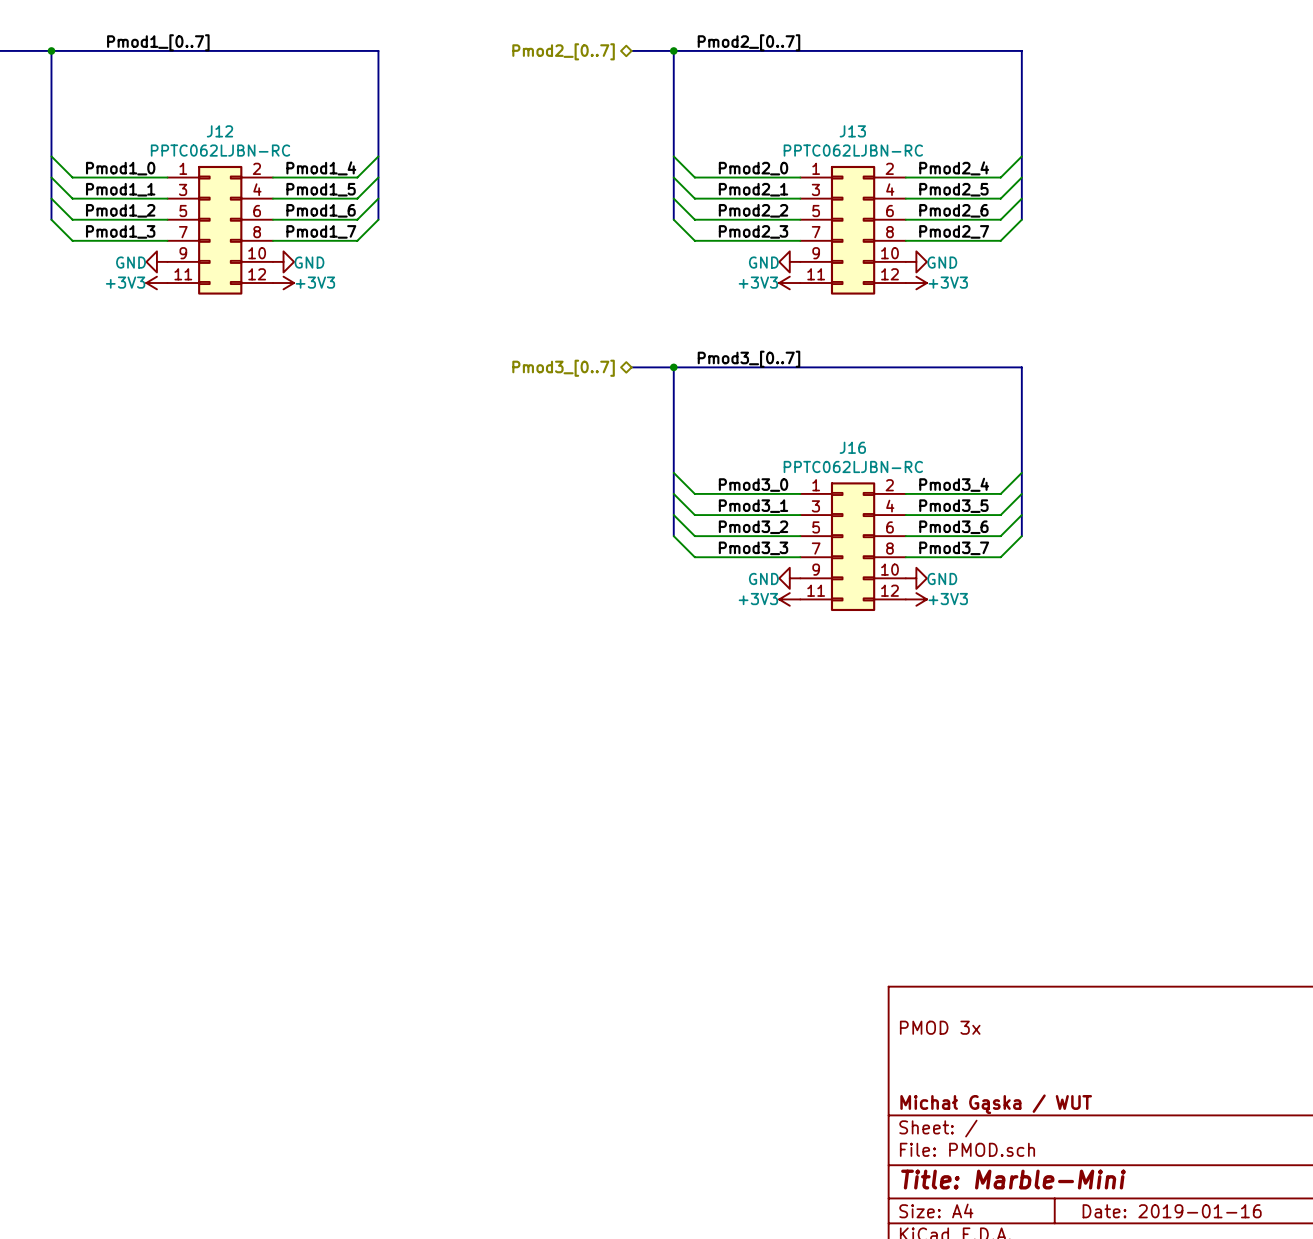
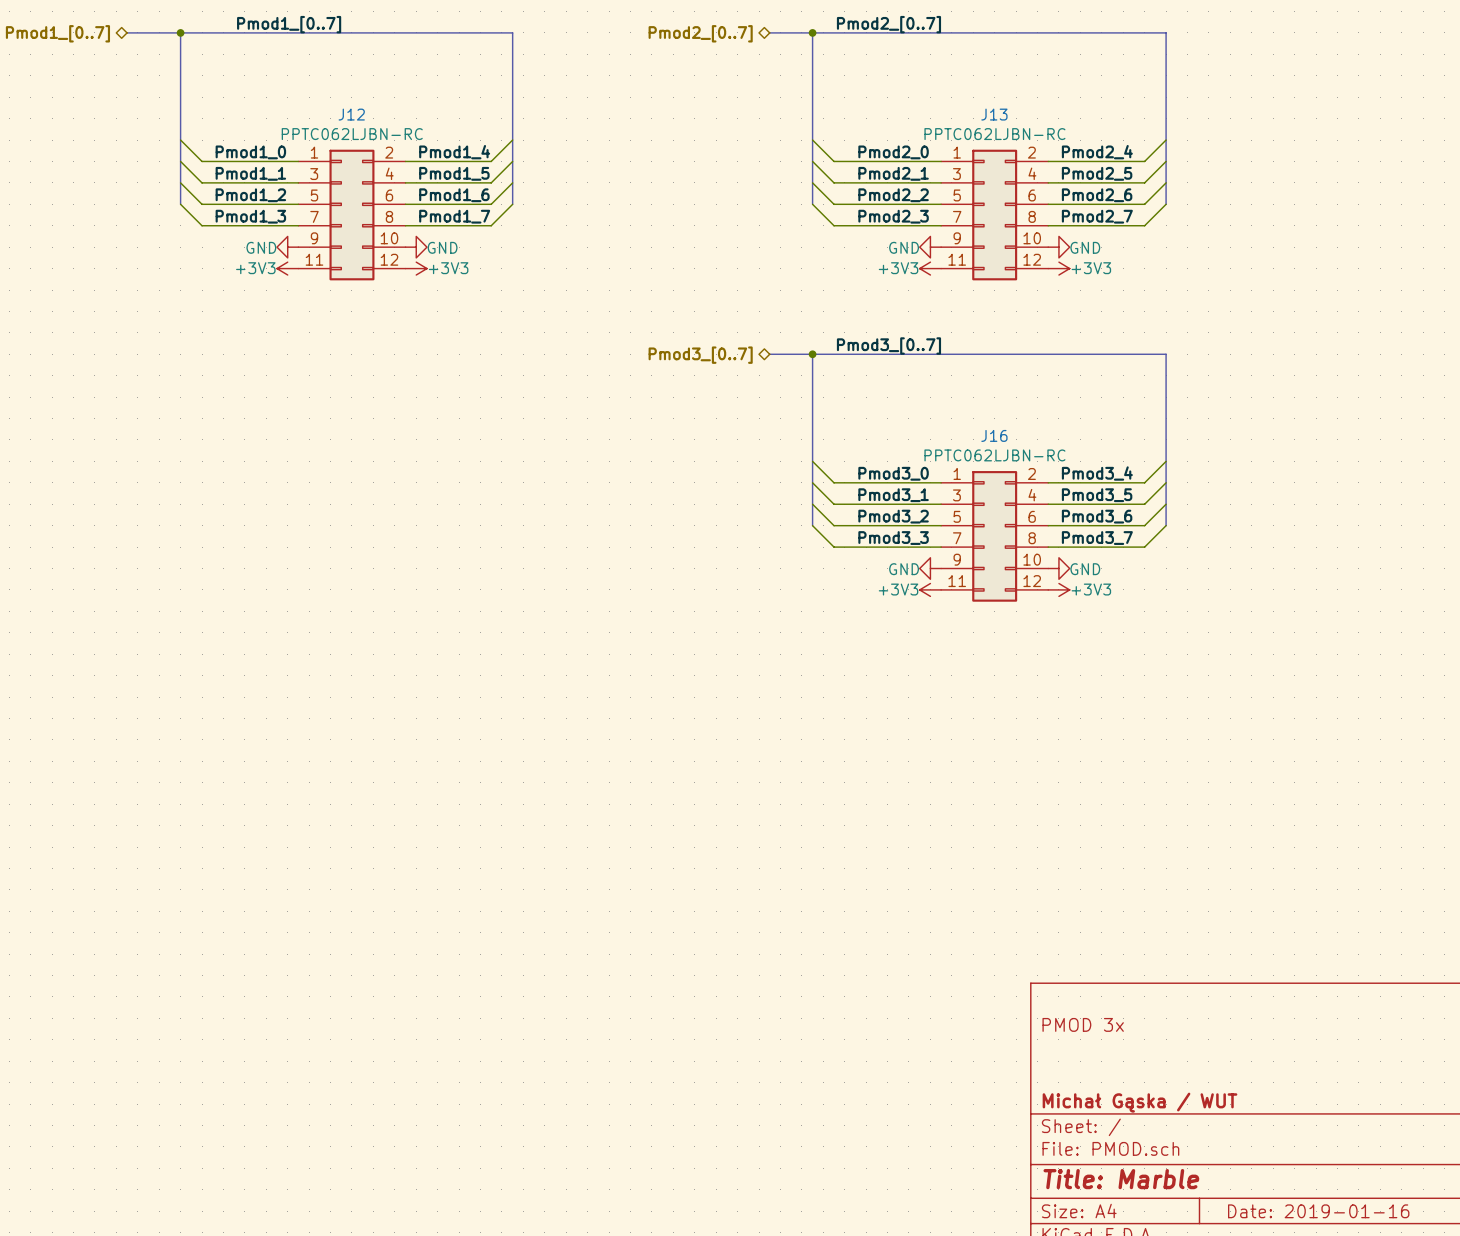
title block: Title: Marble-Mini (1013, 1179) -> Title: Marble (1121, 1179)

